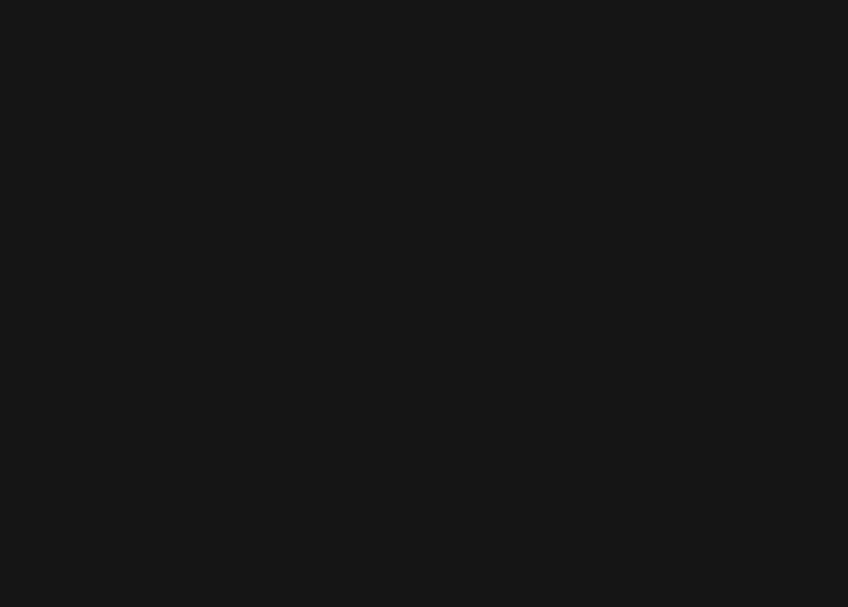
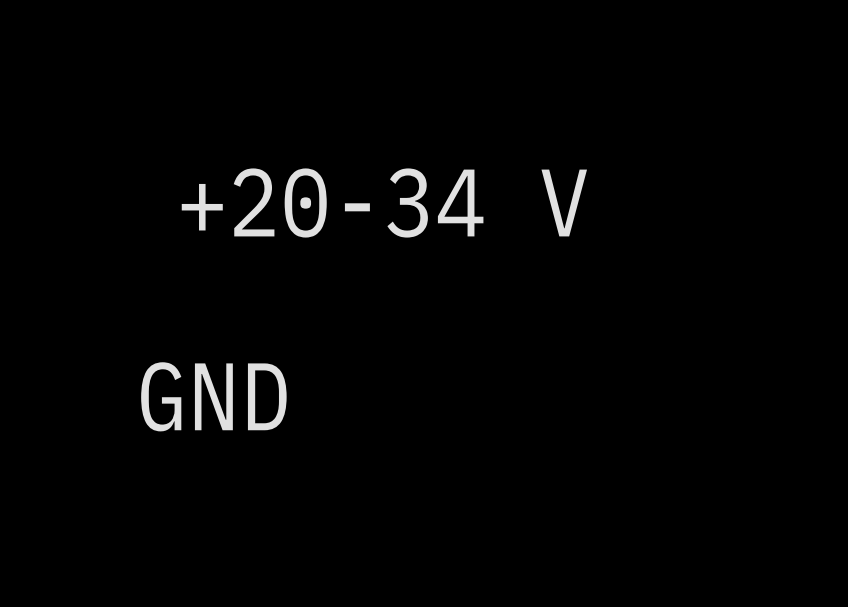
text: none -> +20-34 V (384, 203)
text: none -> GND (213, 396)

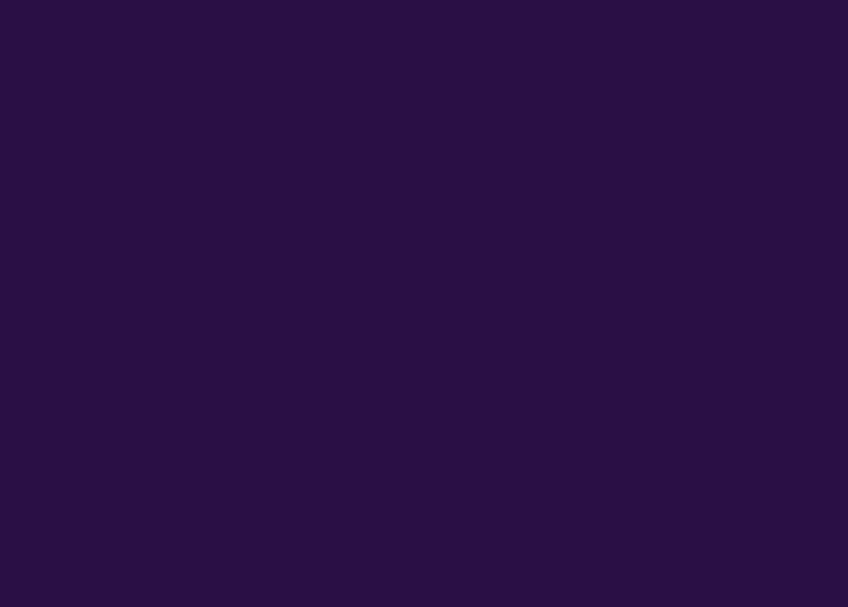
text: +20-34 V (384, 203) -> none
text: GND (213, 396) -> none

